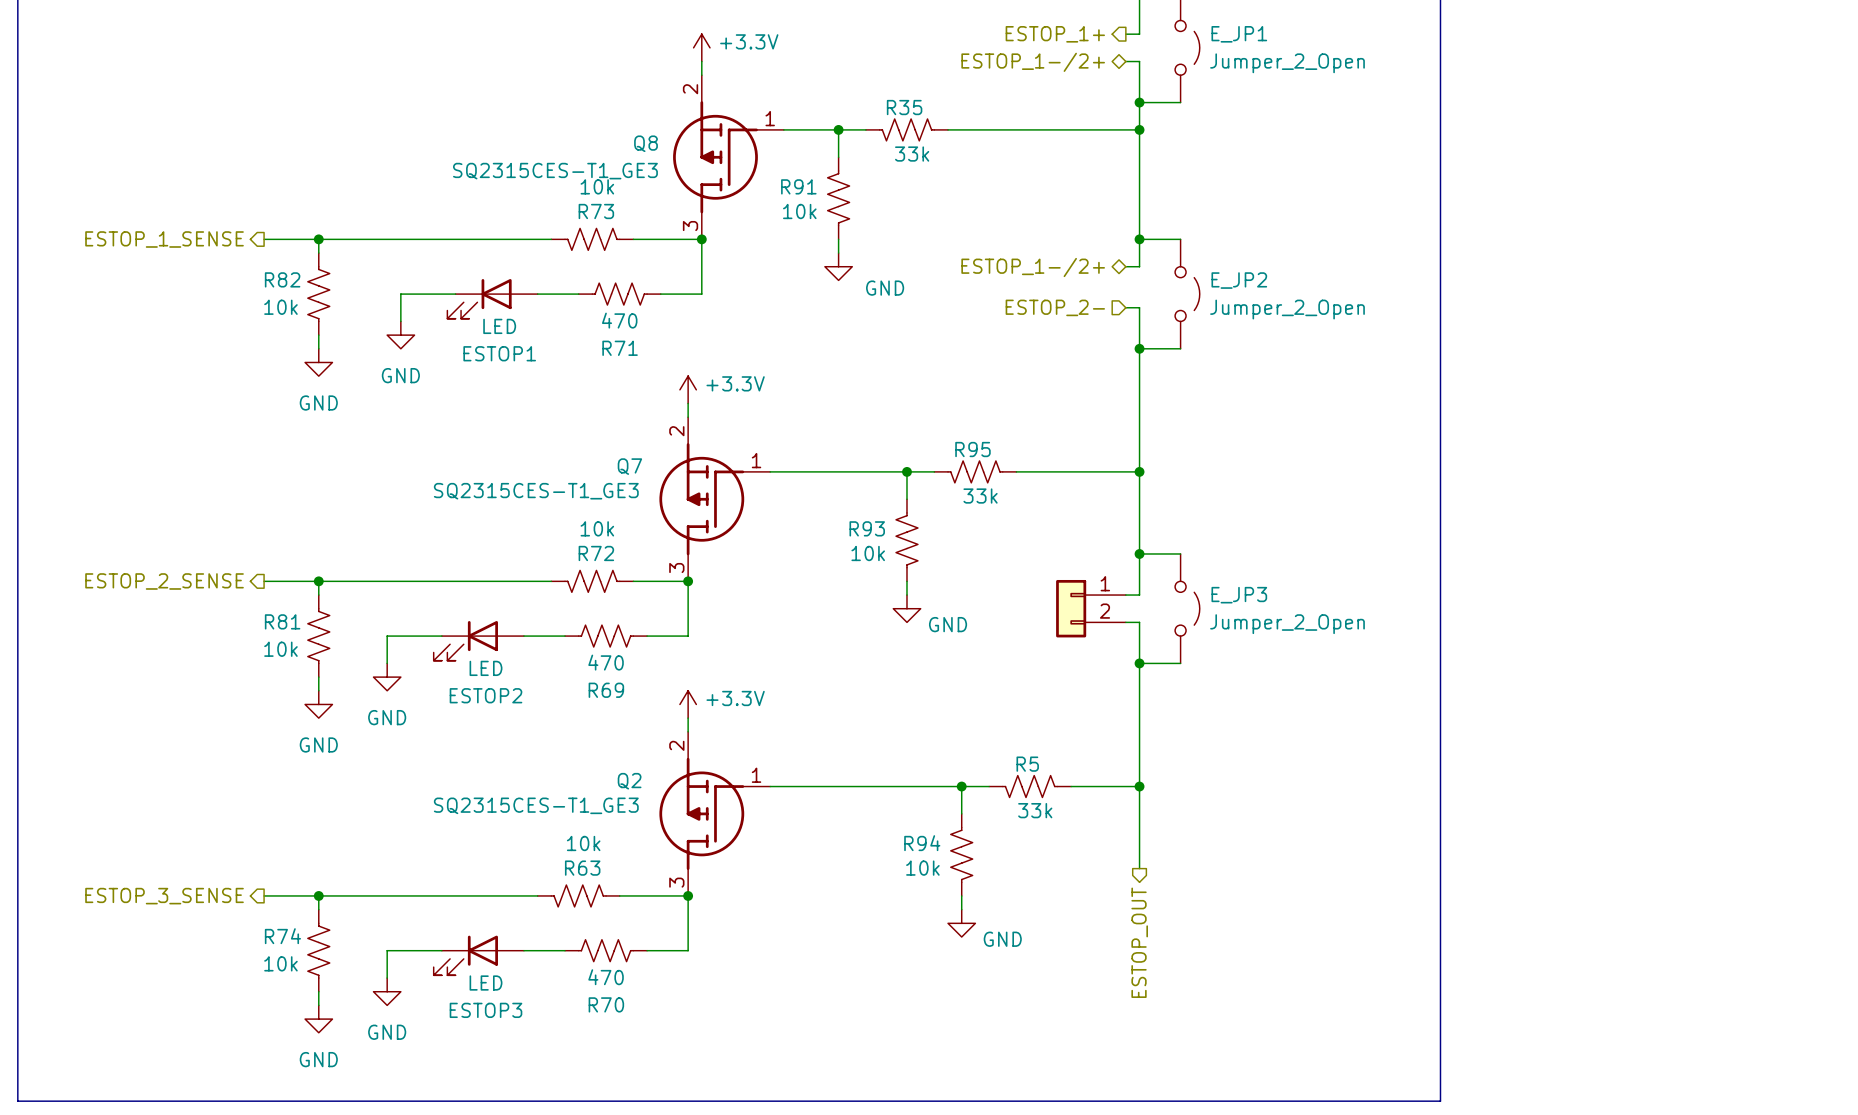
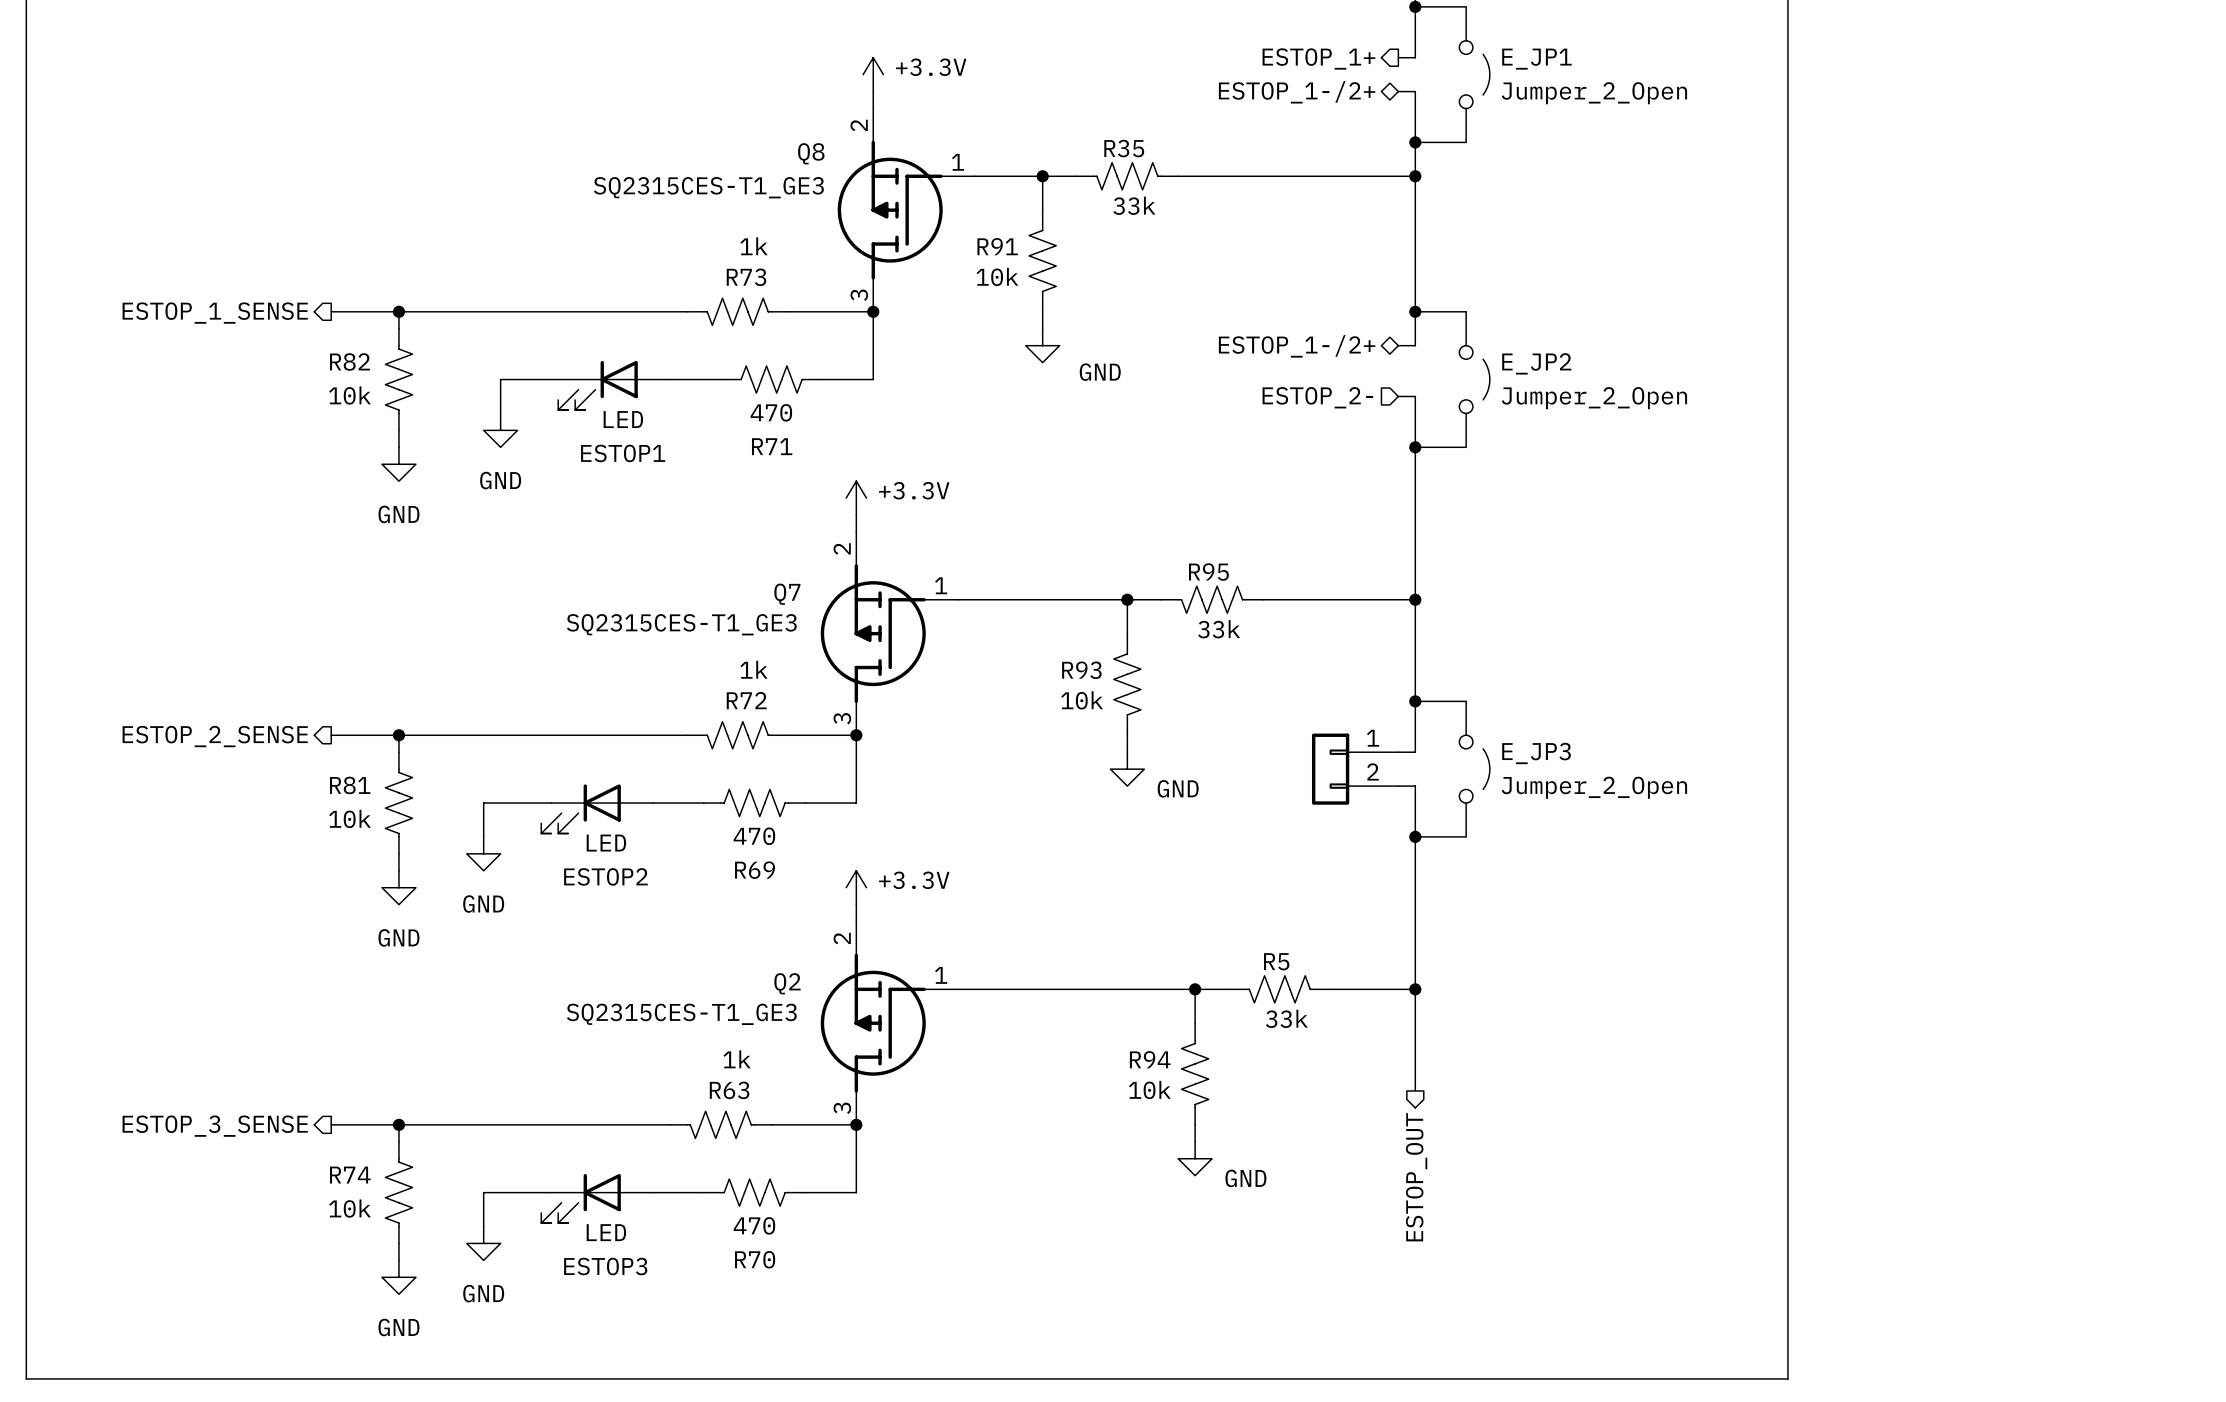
Q8 name position: Q8 (646, 143) -> Q8 (811, 153)
Q8 value position: SQ2315CES-T1_GE3 (555, 171) -> SQ2315CES-T1_GE3 (708, 187)
R73 value: 10k (597, 186) -> 1k (754, 246)
R72 value: 10k (597, 528) -> 1k (754, 669)
R63 value: 10k (583, 843) -> 1k (737, 1059)

